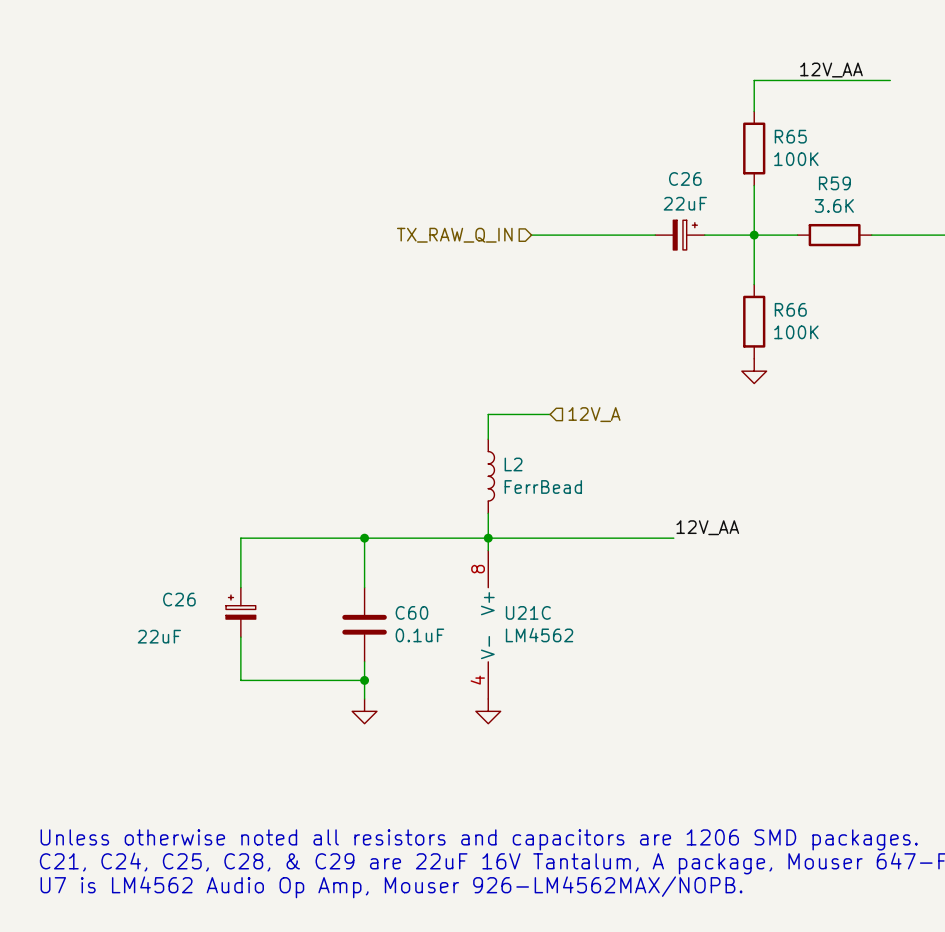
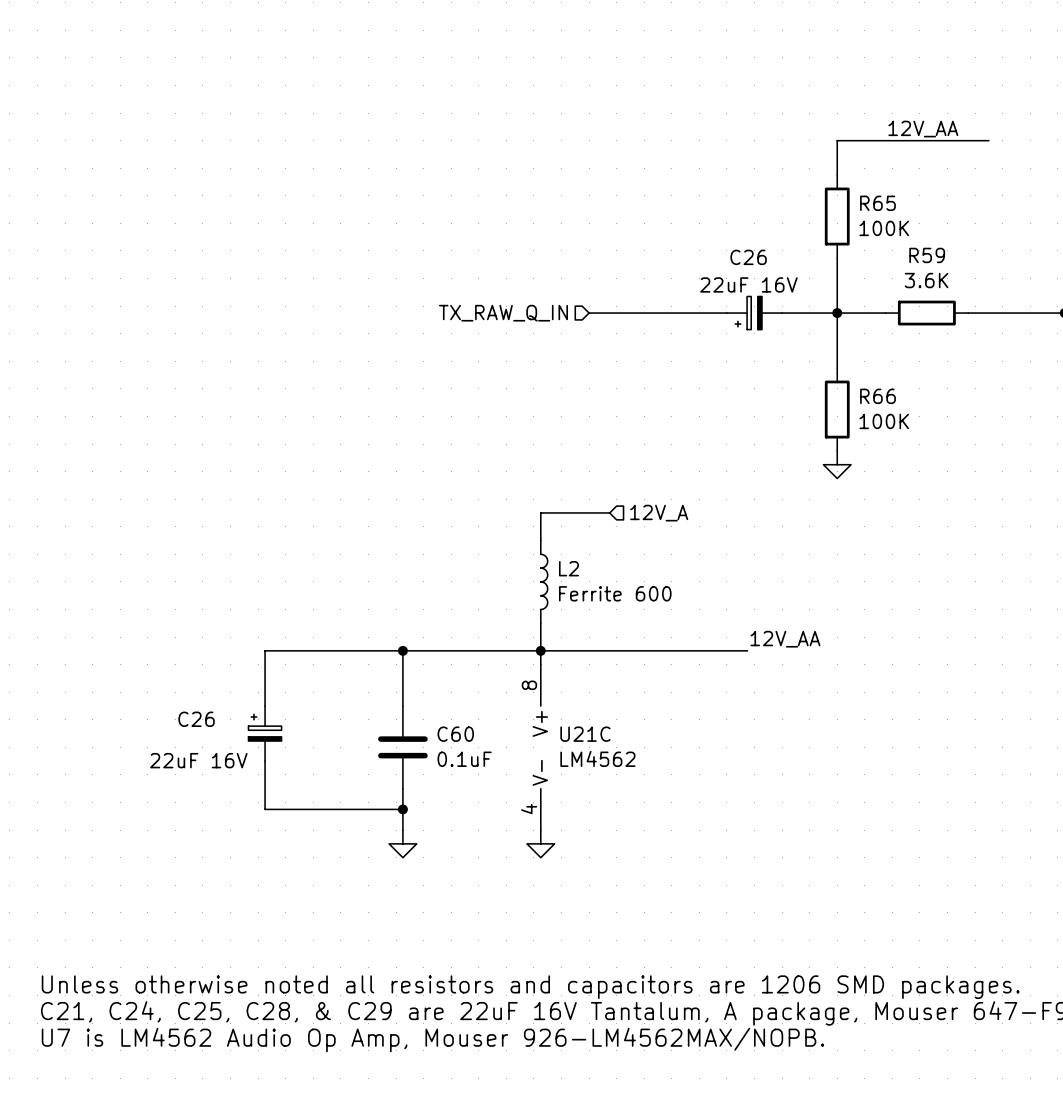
C26 value: 22uF (685, 203) -> 22uF 16V (748, 284)
C26 rotation: 0° (685, 235) -> 180° (748, 313)
L2 value: FerrBead (543, 486) -> Ferrite 600 (615, 593)
C26 value: 22uF (159, 636) -> 22uF 16V (198, 760)

